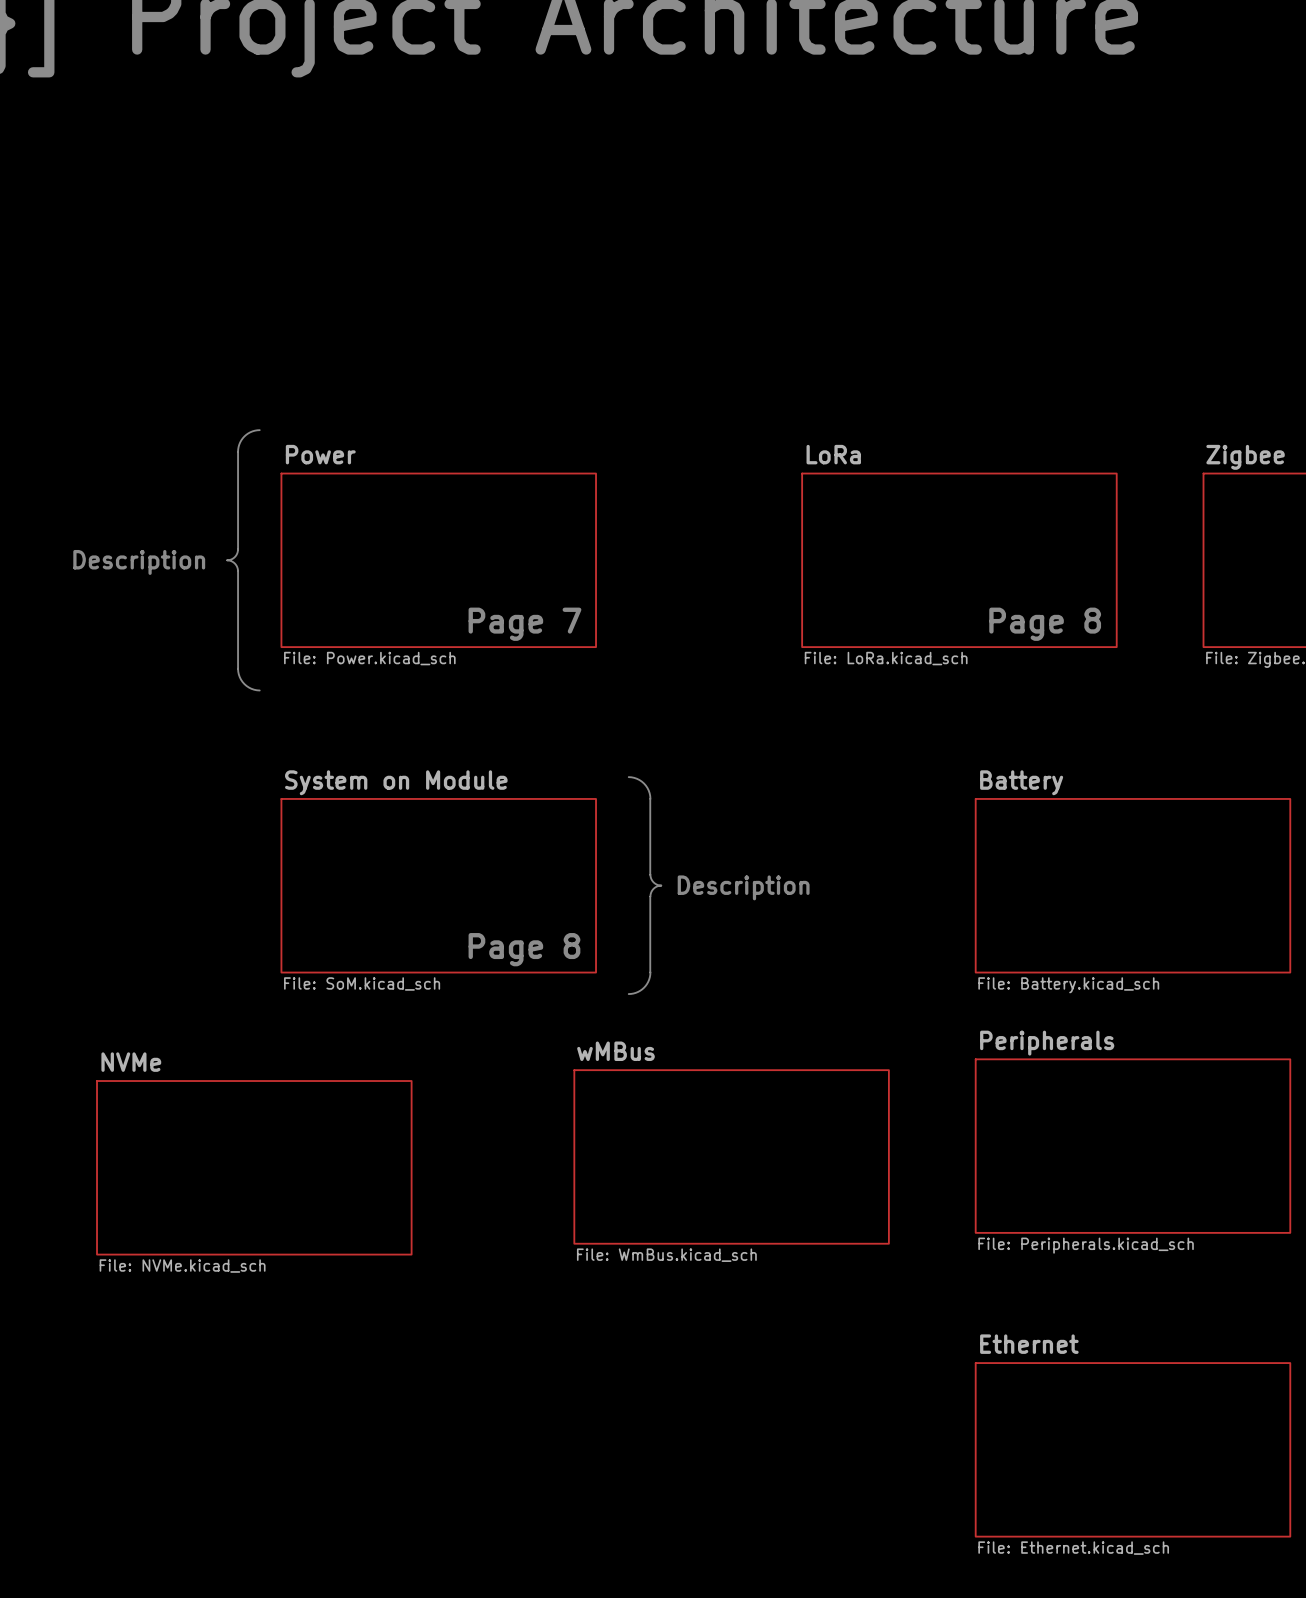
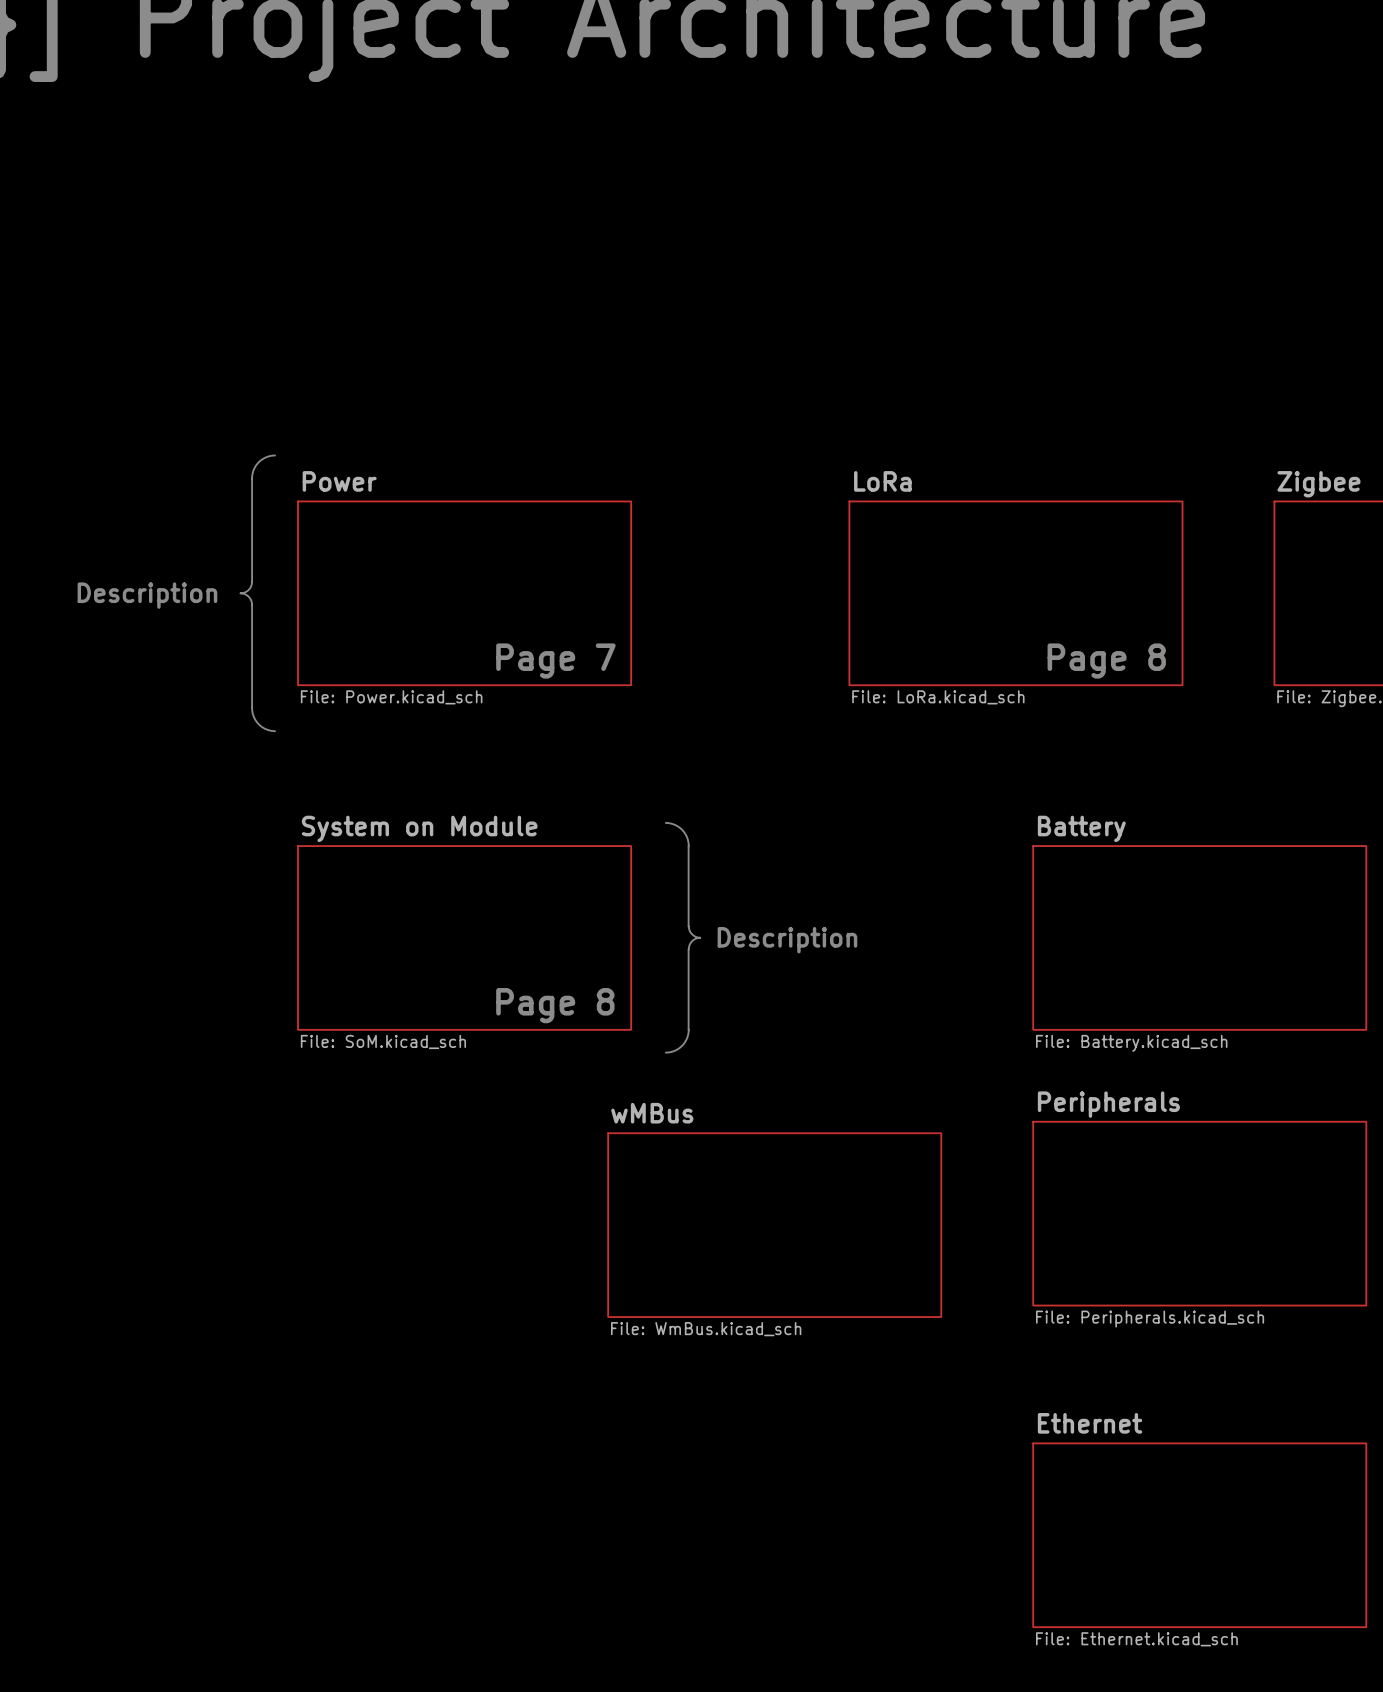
sheet NVMe: File: NVMe.kicad_sch (254, 1167) -> none

